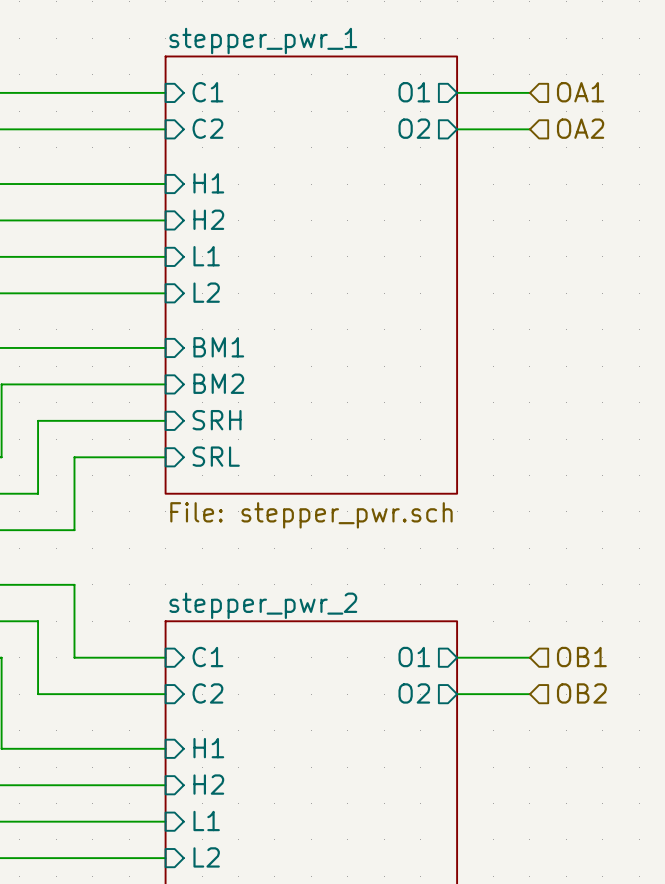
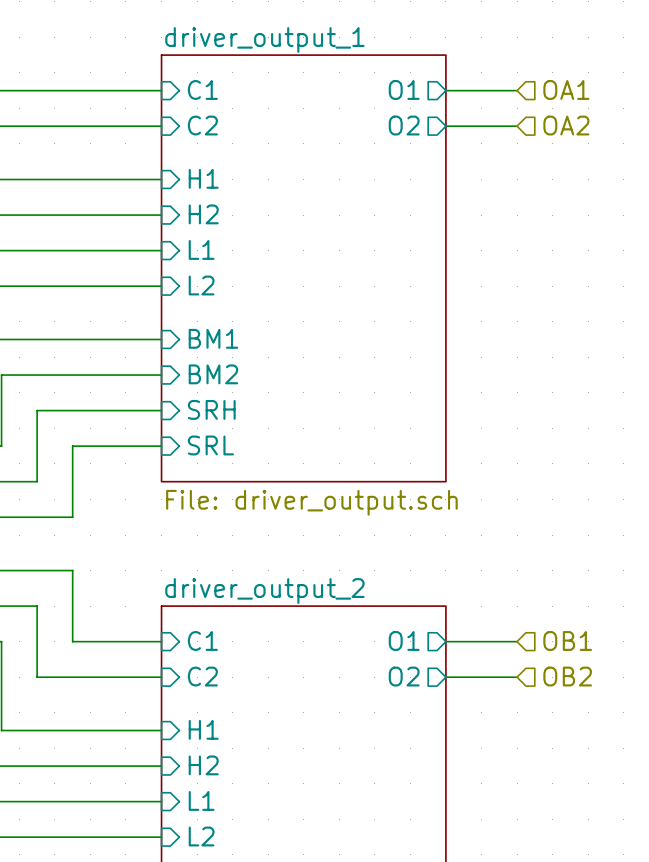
sheet stepper_pwr_1 name: stepper_pwr_1 (263, 41) -> driver_output_1 (264, 39)
sheet stepper_pwr_1 value: File: stepper_pwr.sch (311, 515) -> File: driver_output.sch (311, 502)
sheet stepper_pwr_2 name: stepper_pwr_2 (263, 605) -> driver_output_2 (264, 591)

